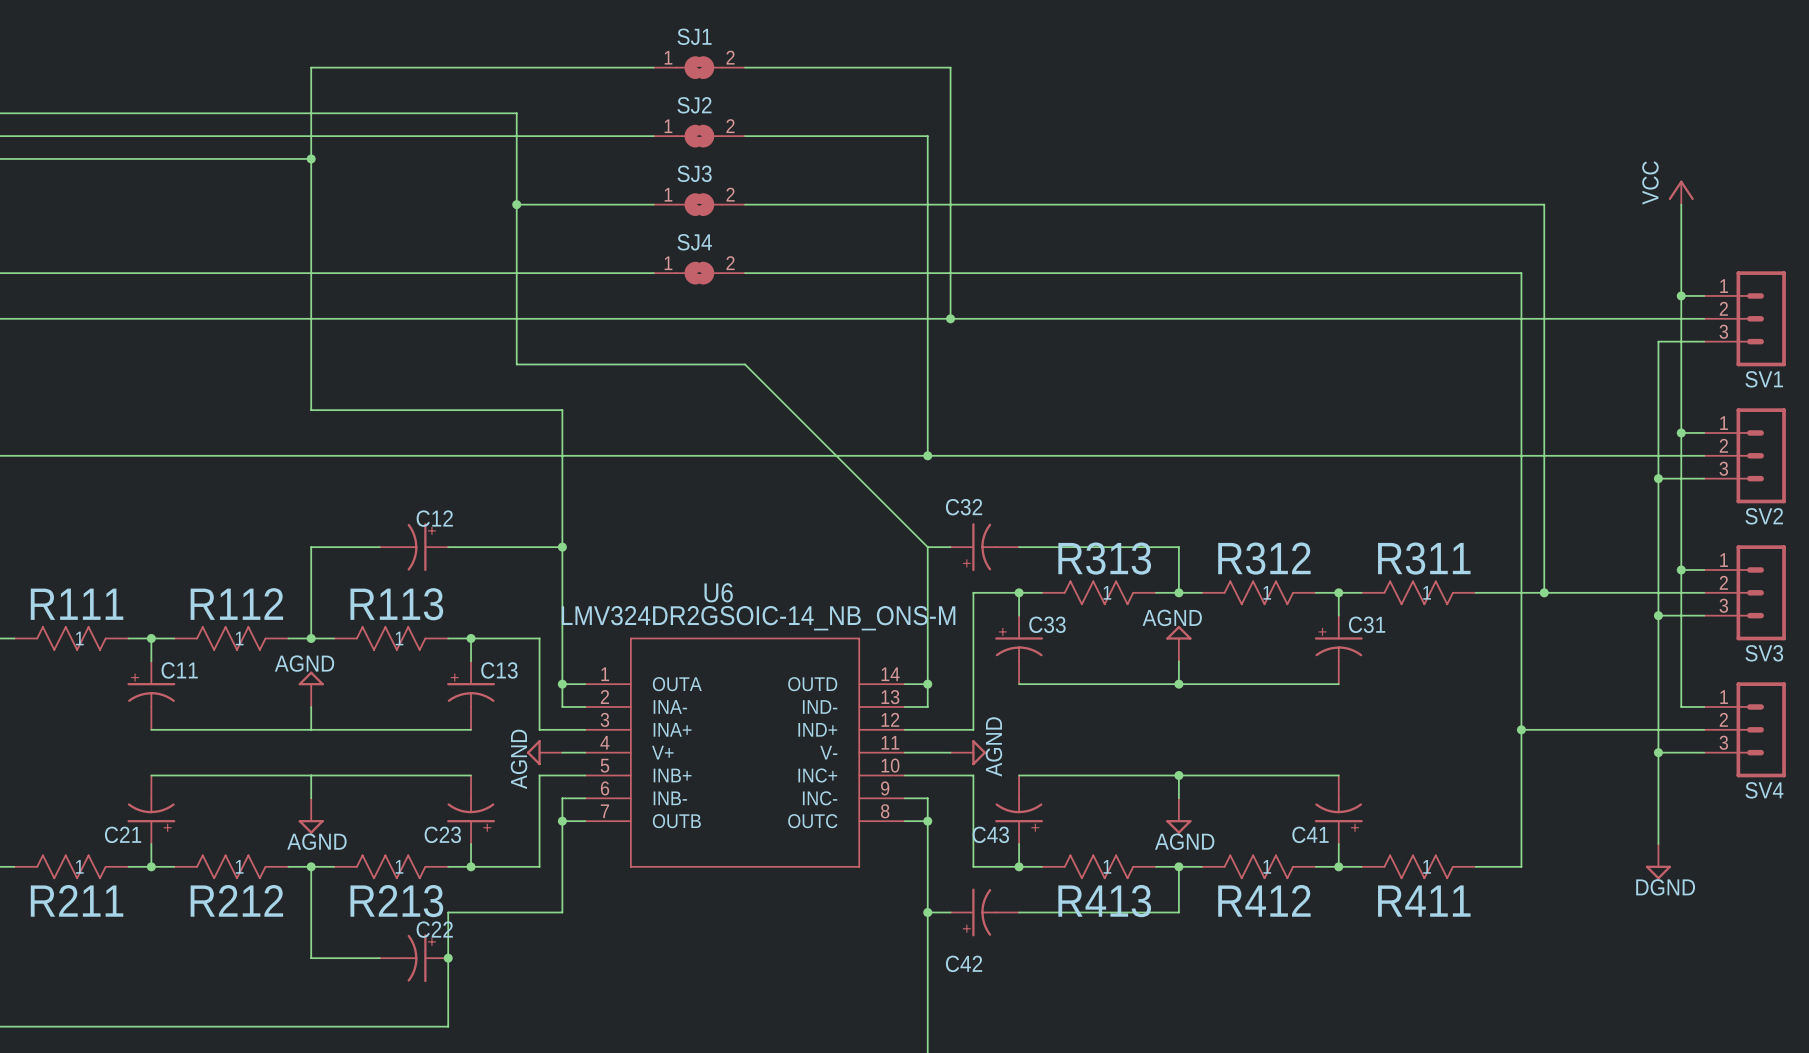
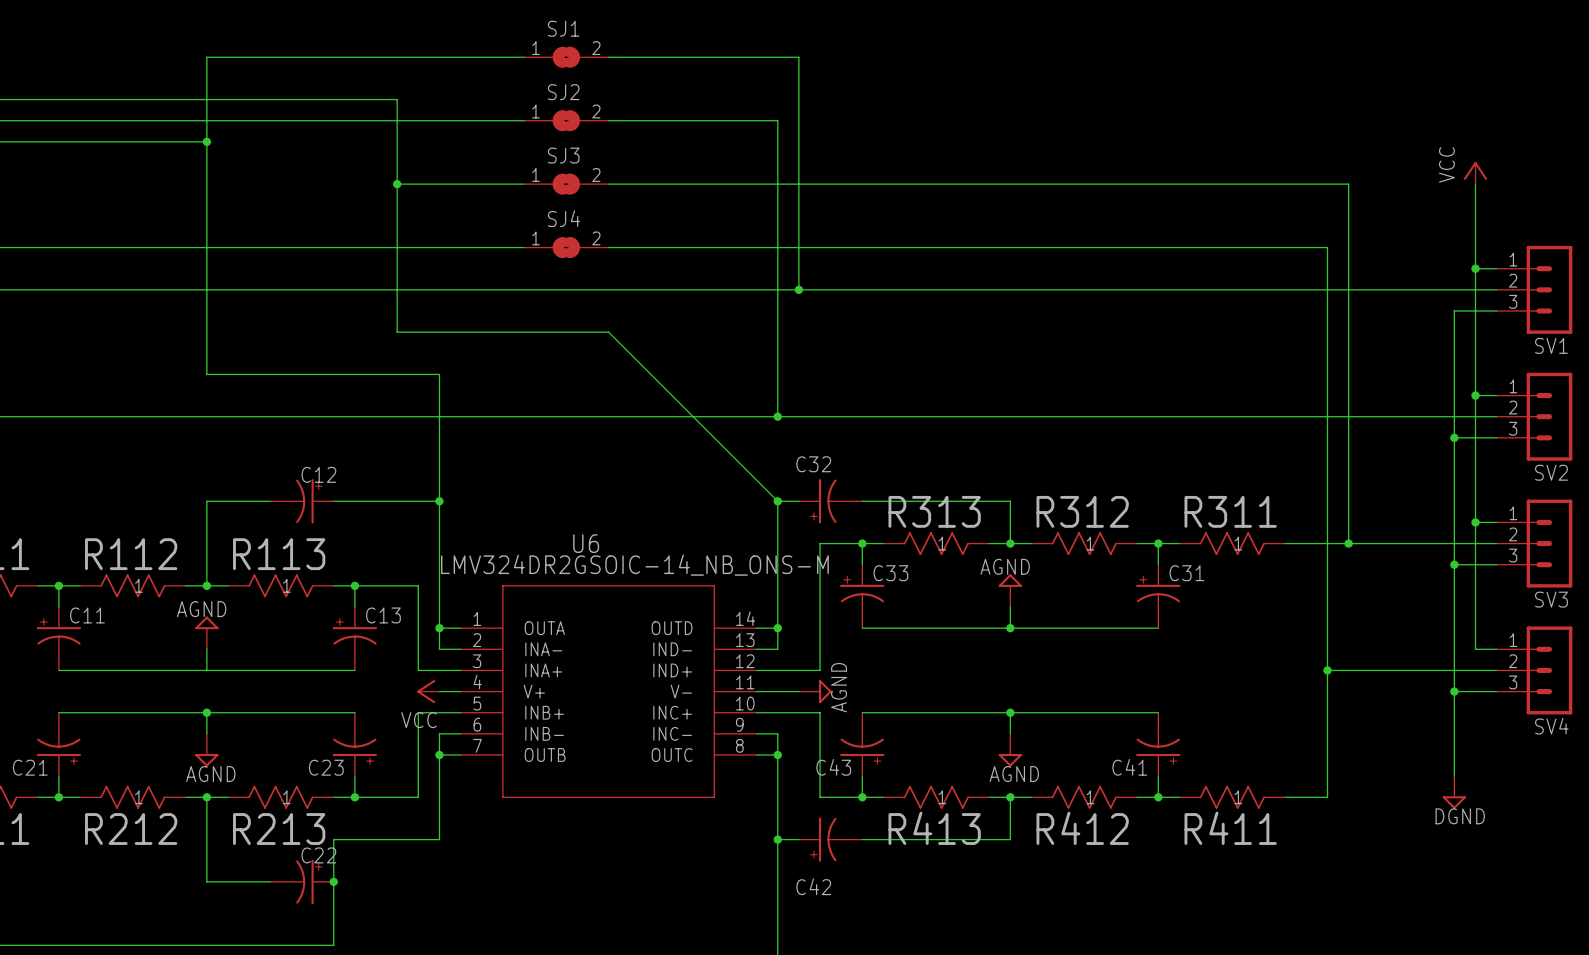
junction: none -> (777, 501)
power symbol: AGND (544, 752) -> VCC (428, 691)
junction: none -> (206, 712)

